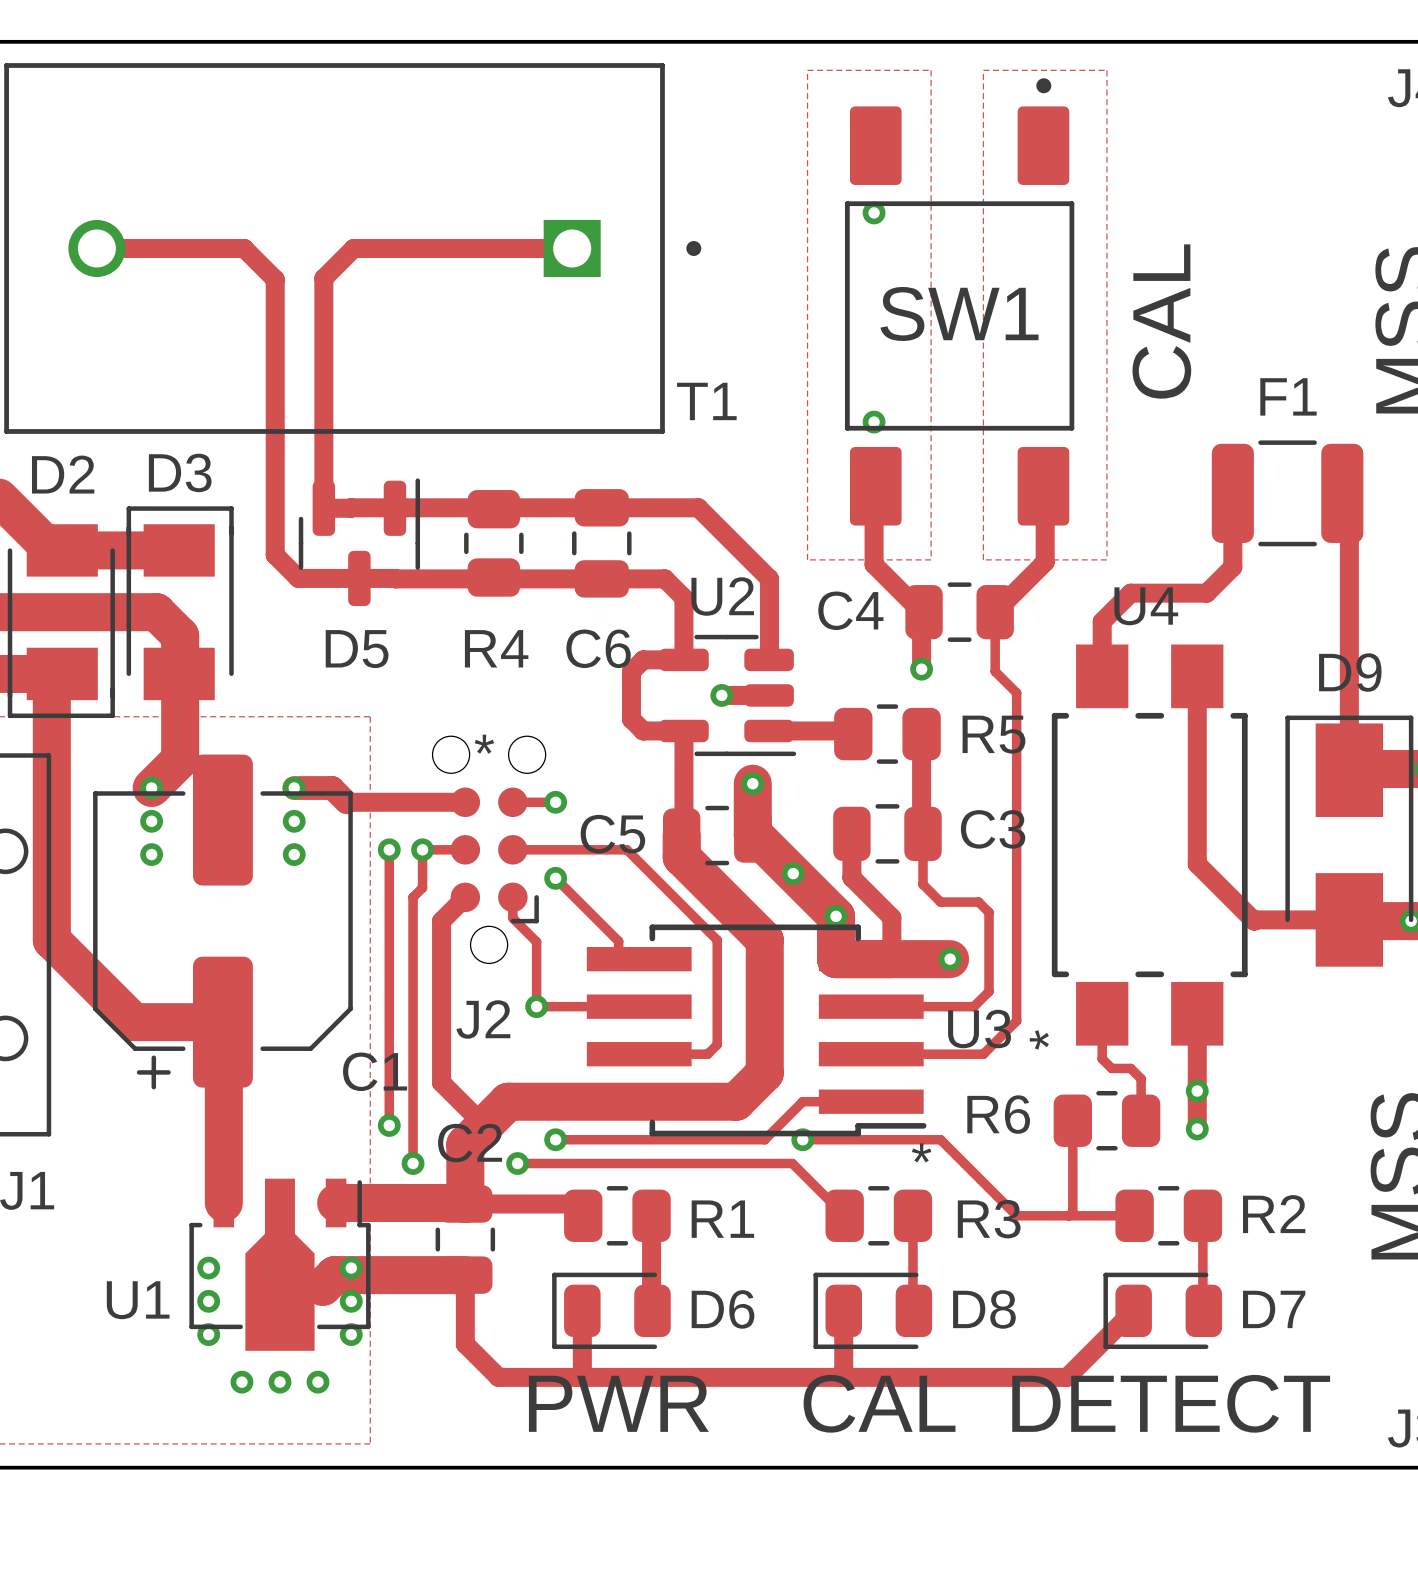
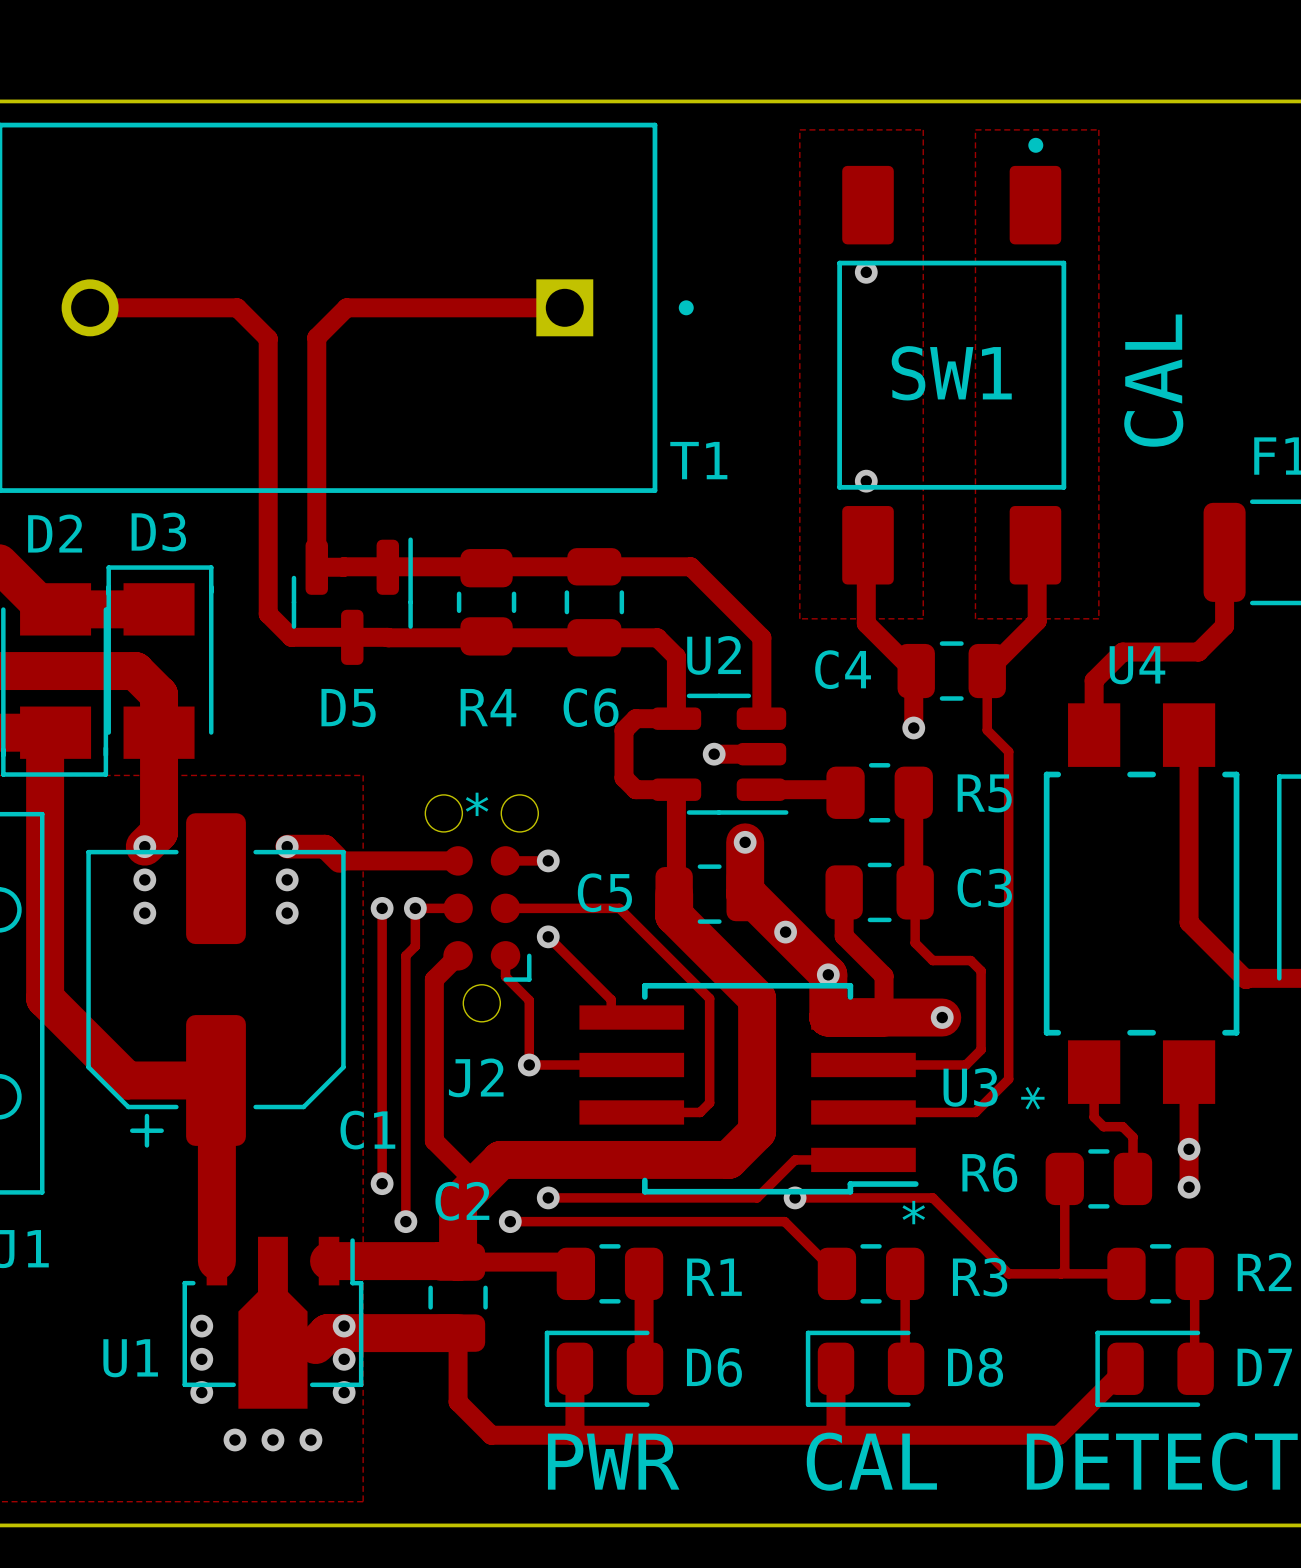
D3 position: (180, 603) -> (159, 662)
track: (142, 612) (156, 612) (180, 635) (180, 759) (165, 773) -> (135, 671) (159, 694) (159, 832)

